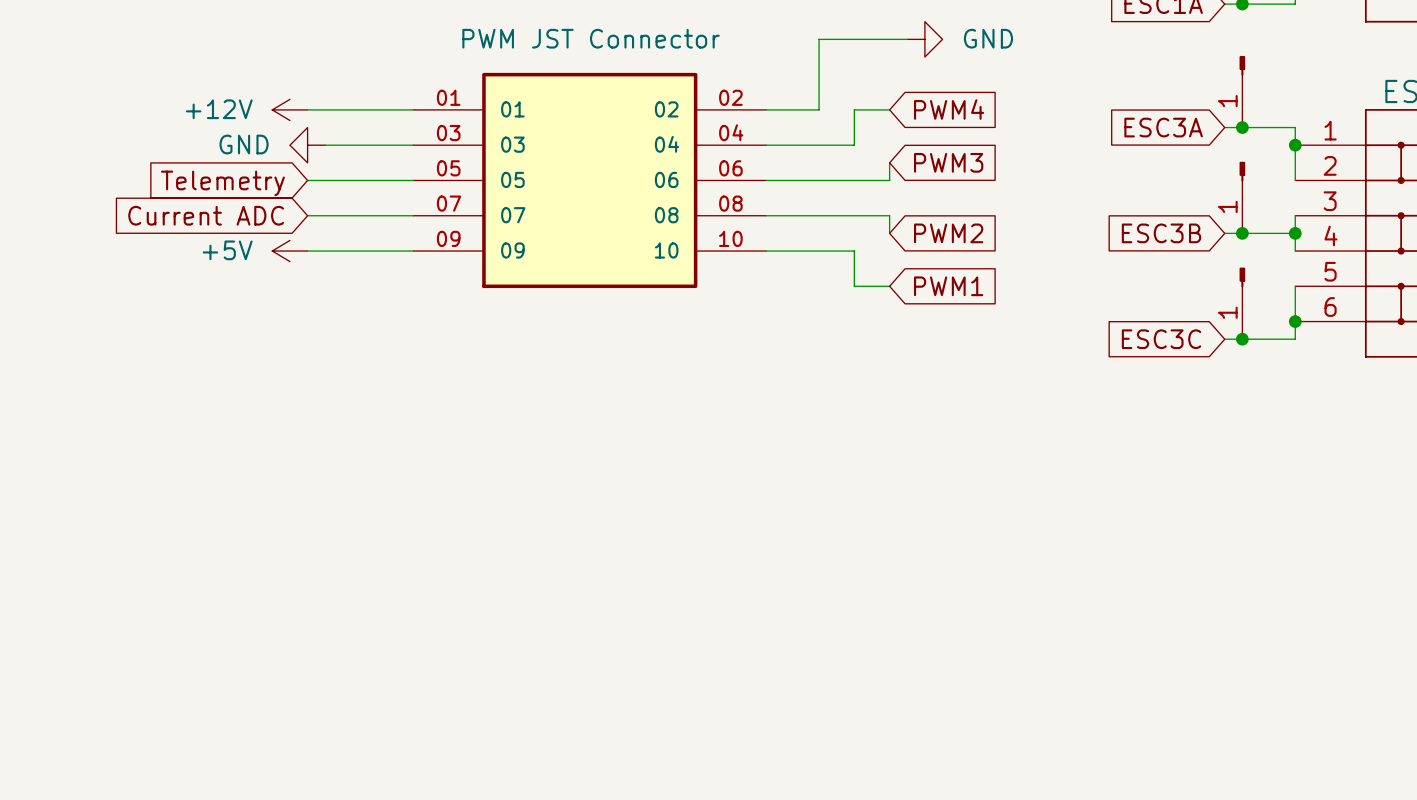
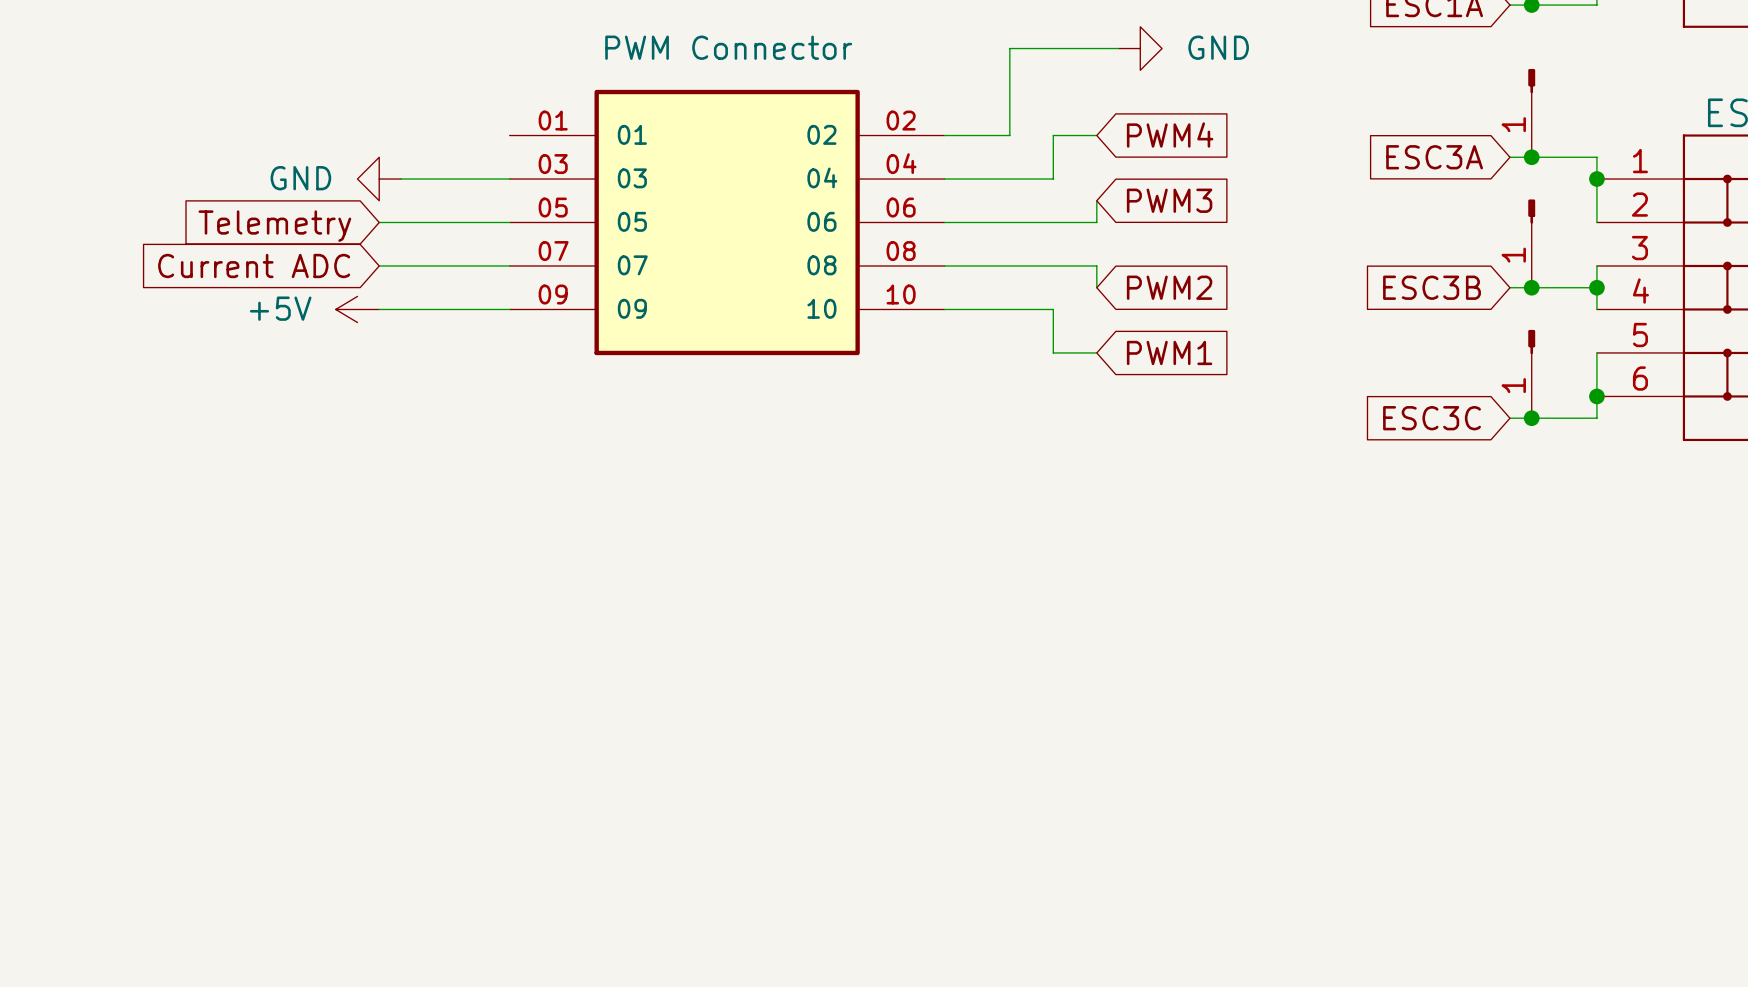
part value: PWM JST Connector (591, 38) -> PWM Connector (728, 47)
power symbol: +12V (289, 109) -> none
wire: (307, 109) (413, 109) -> none

